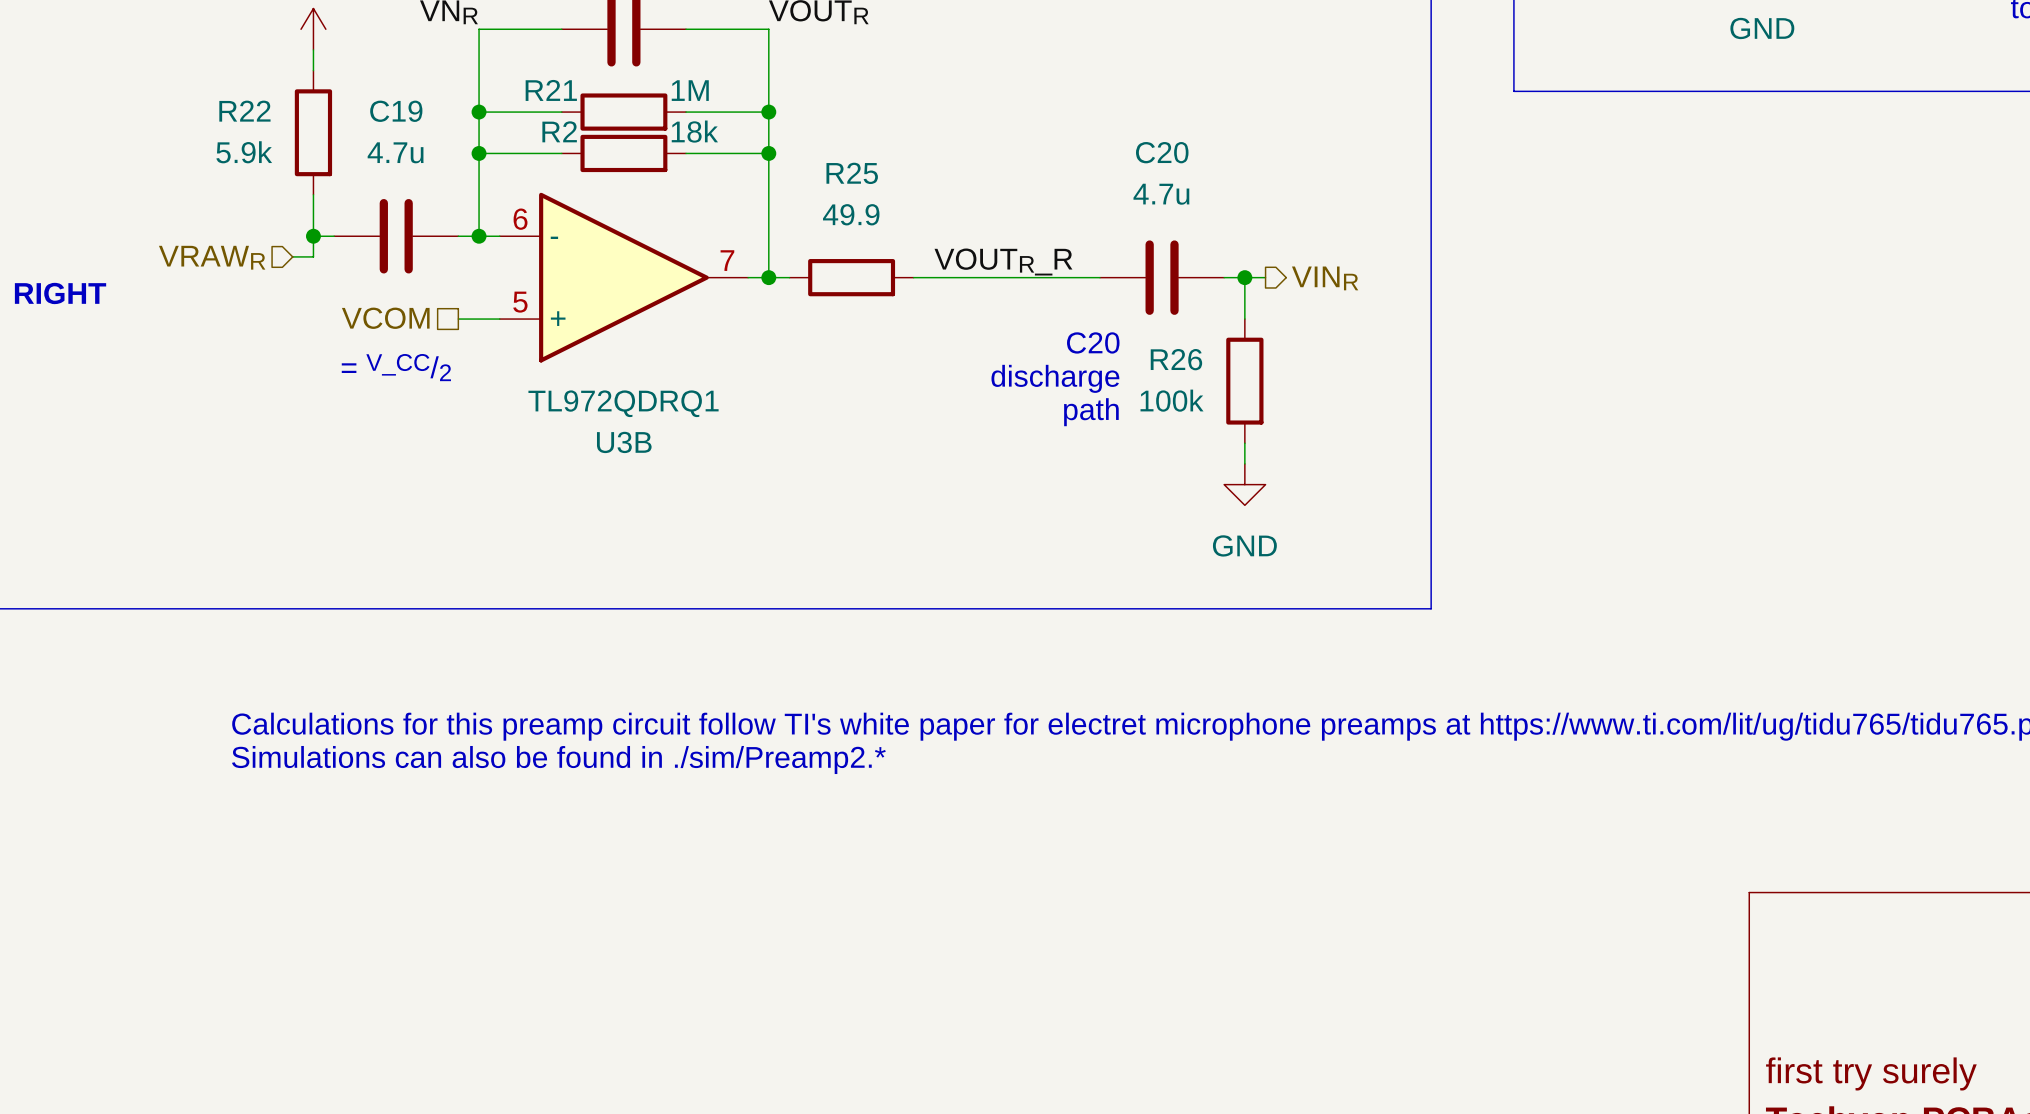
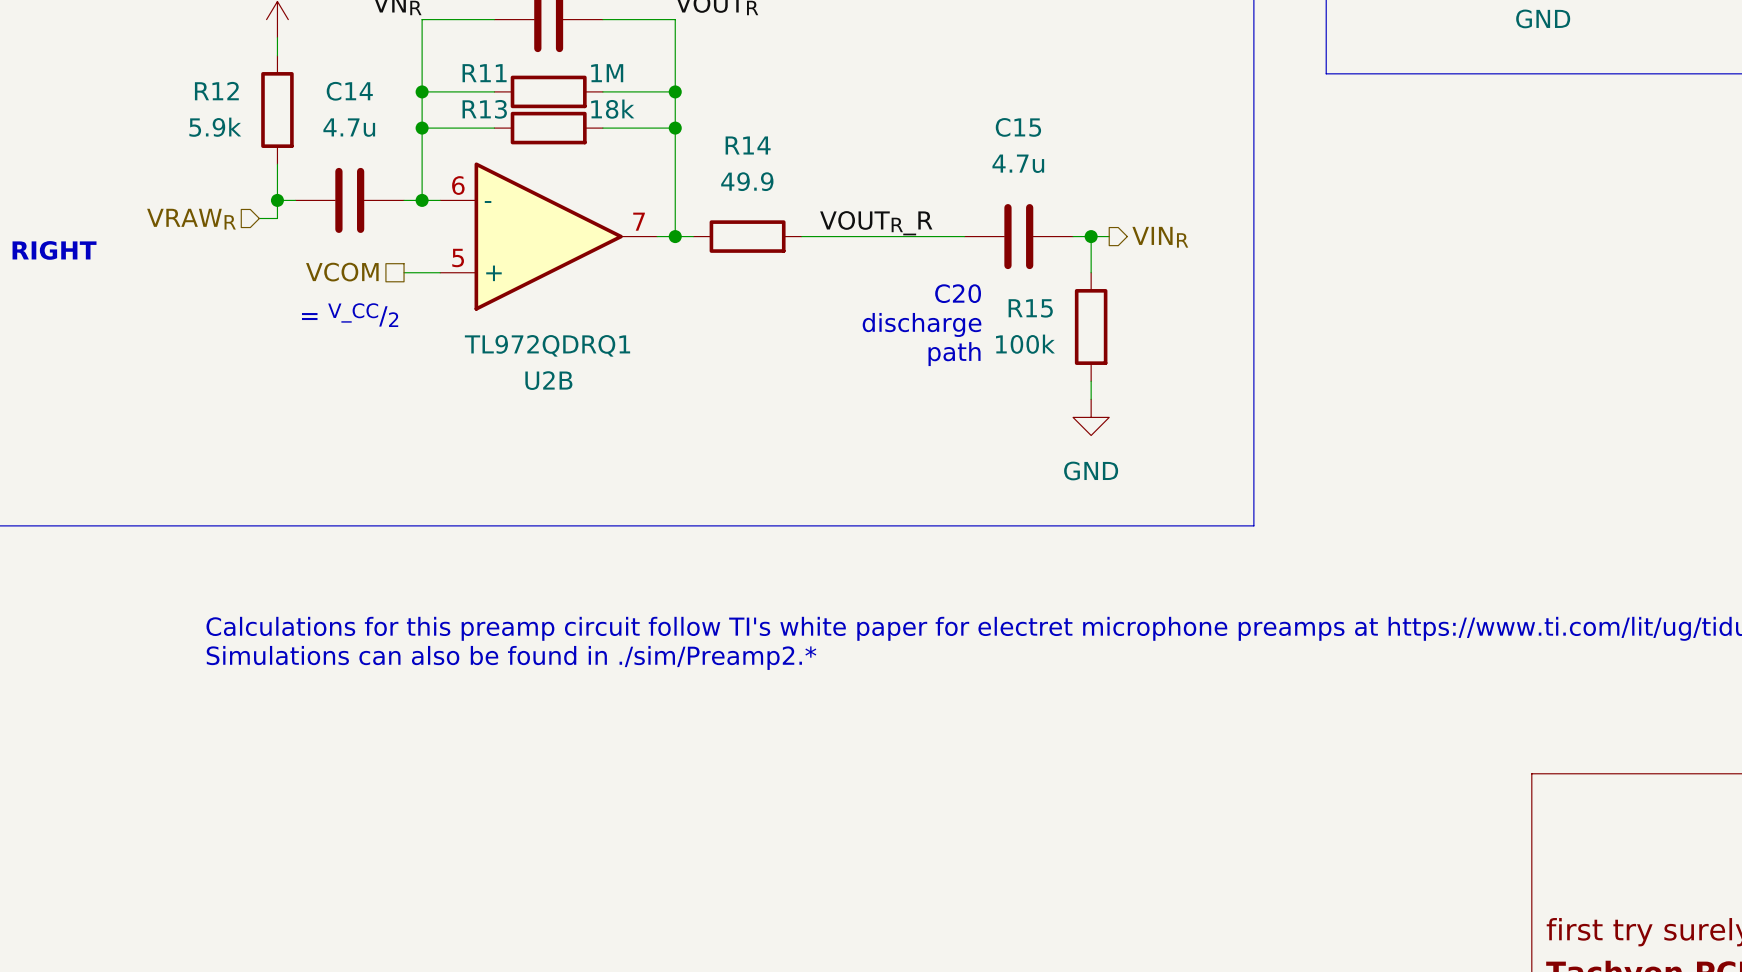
R21 name: R21 (551, 90) -> R11 (484, 73)
R22 name: R22 (244, 111) -> R12 (216, 91)
C19 name: C19 (396, 111) -> C14 (349, 91)
R2 name: R2 (559, 131) -> R13 (484, 109)
C20 name: C20 (1162, 152) -> C15 (1018, 127)
R25 name: R25 (852, 173) -> R14 (748, 145)
R26 name: R26 (1176, 359) -> R15 (1030, 308)
U3B name: U3B (624, 442) -> U2B (548, 380)

